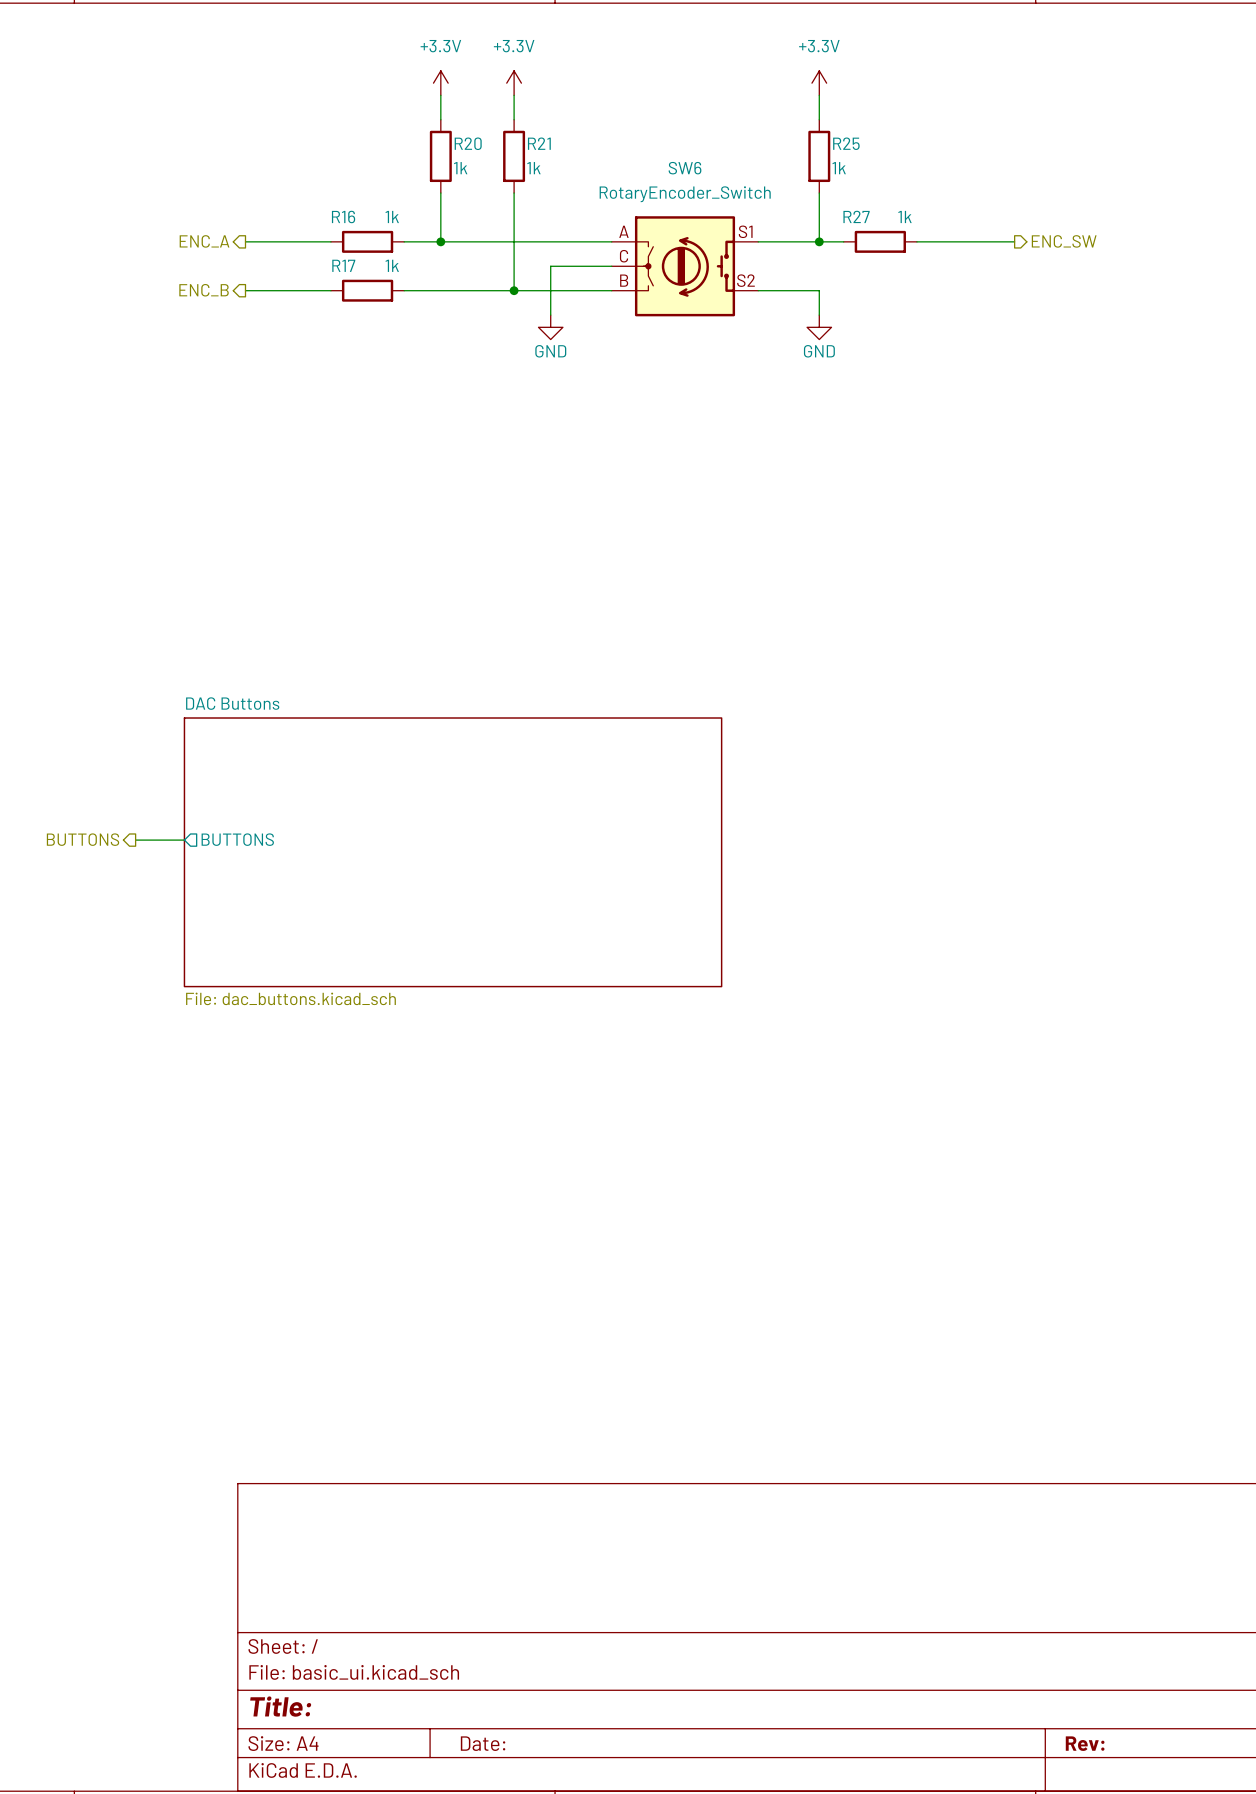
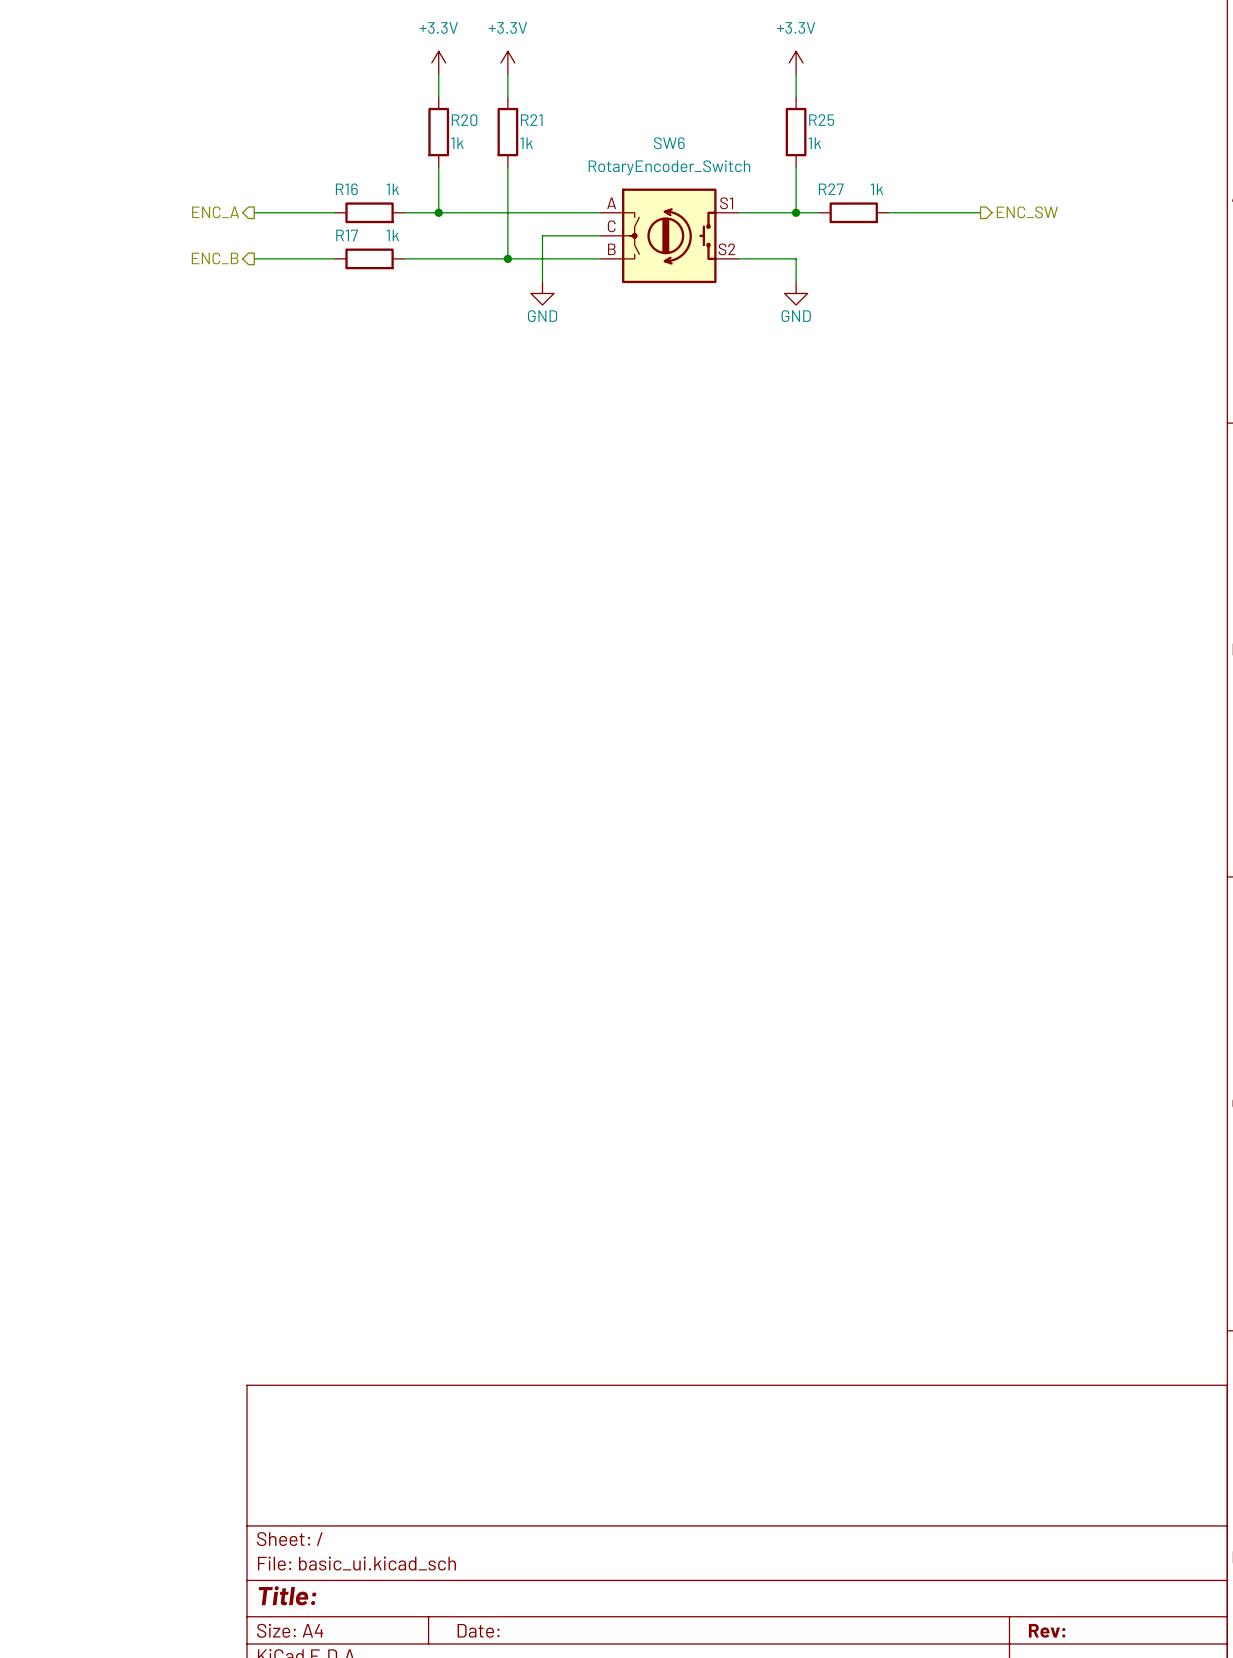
hierarchical label: BUTTONS (83, 839) -> none
sheet pin: BUTTONS (237, 839) -> none
wire: (135, 840) (184, 840) -> none
sheet DAC Buttons: File: dac_buttons.kicad_sch (453, 852) -> none

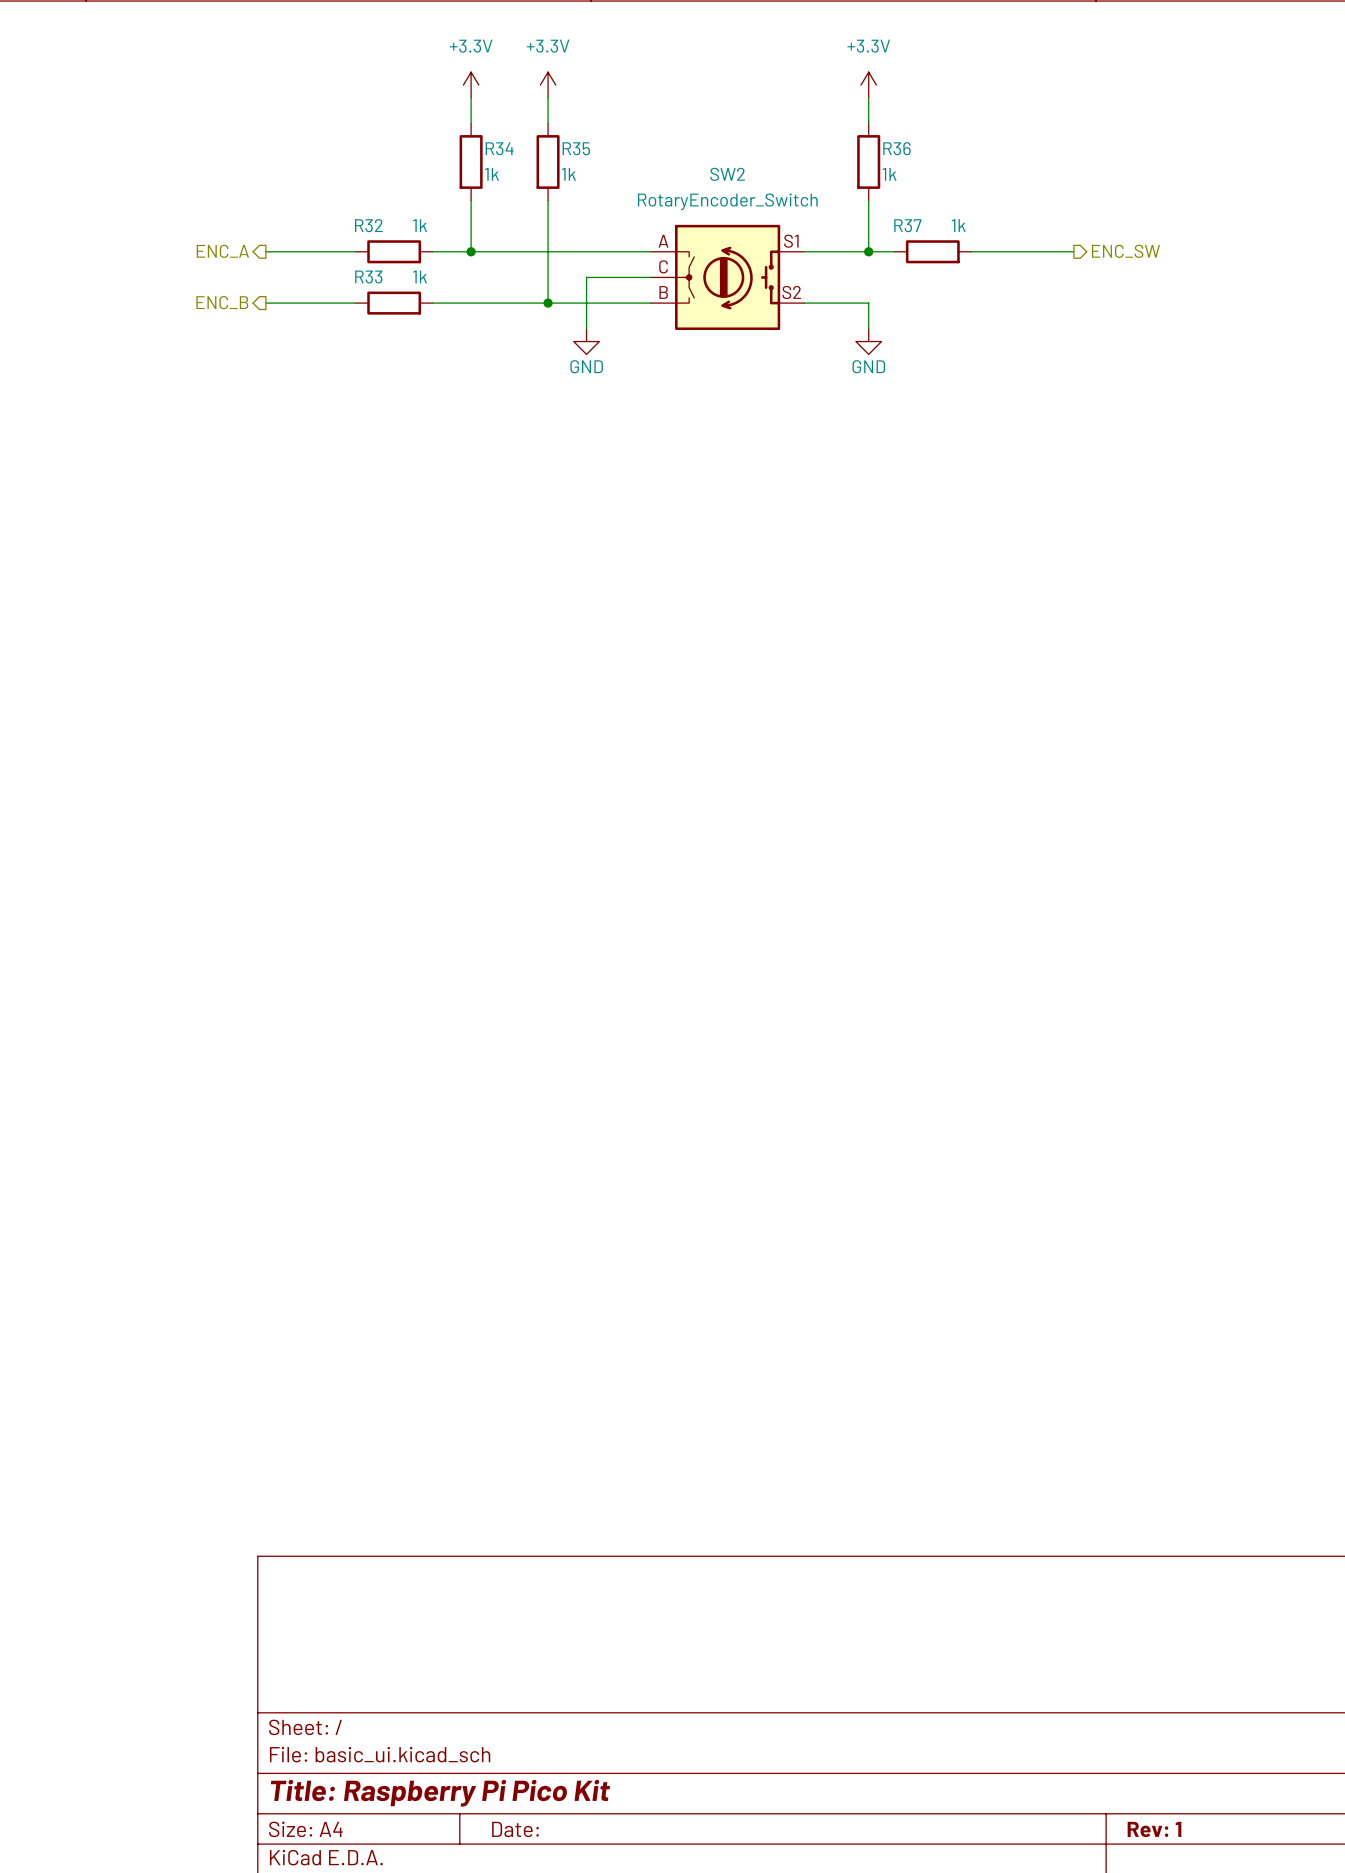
R20 name: R20 (464, 120) -> R34 (499, 148)
R21 name: R21 (531, 120) -> R35 (576, 148)
R25 name: R25 (821, 120) -> R36 (896, 148)
SW6 name: SW6 (669, 143) -> SW2 (727, 174)
R16 name: R16 (346, 189) -> R32 (368, 225)
R27 name: R27 (831, 189) -> R37 (907, 225)
R17 name: R17 (347, 235) -> R33 (368, 277)
title block: Title: (287, 1595) -> Title: Raspberry Pi Pico Kit (440, 1793)
title block: Rev: (1047, 1630) -> Rev: 1 (1154, 1829)

